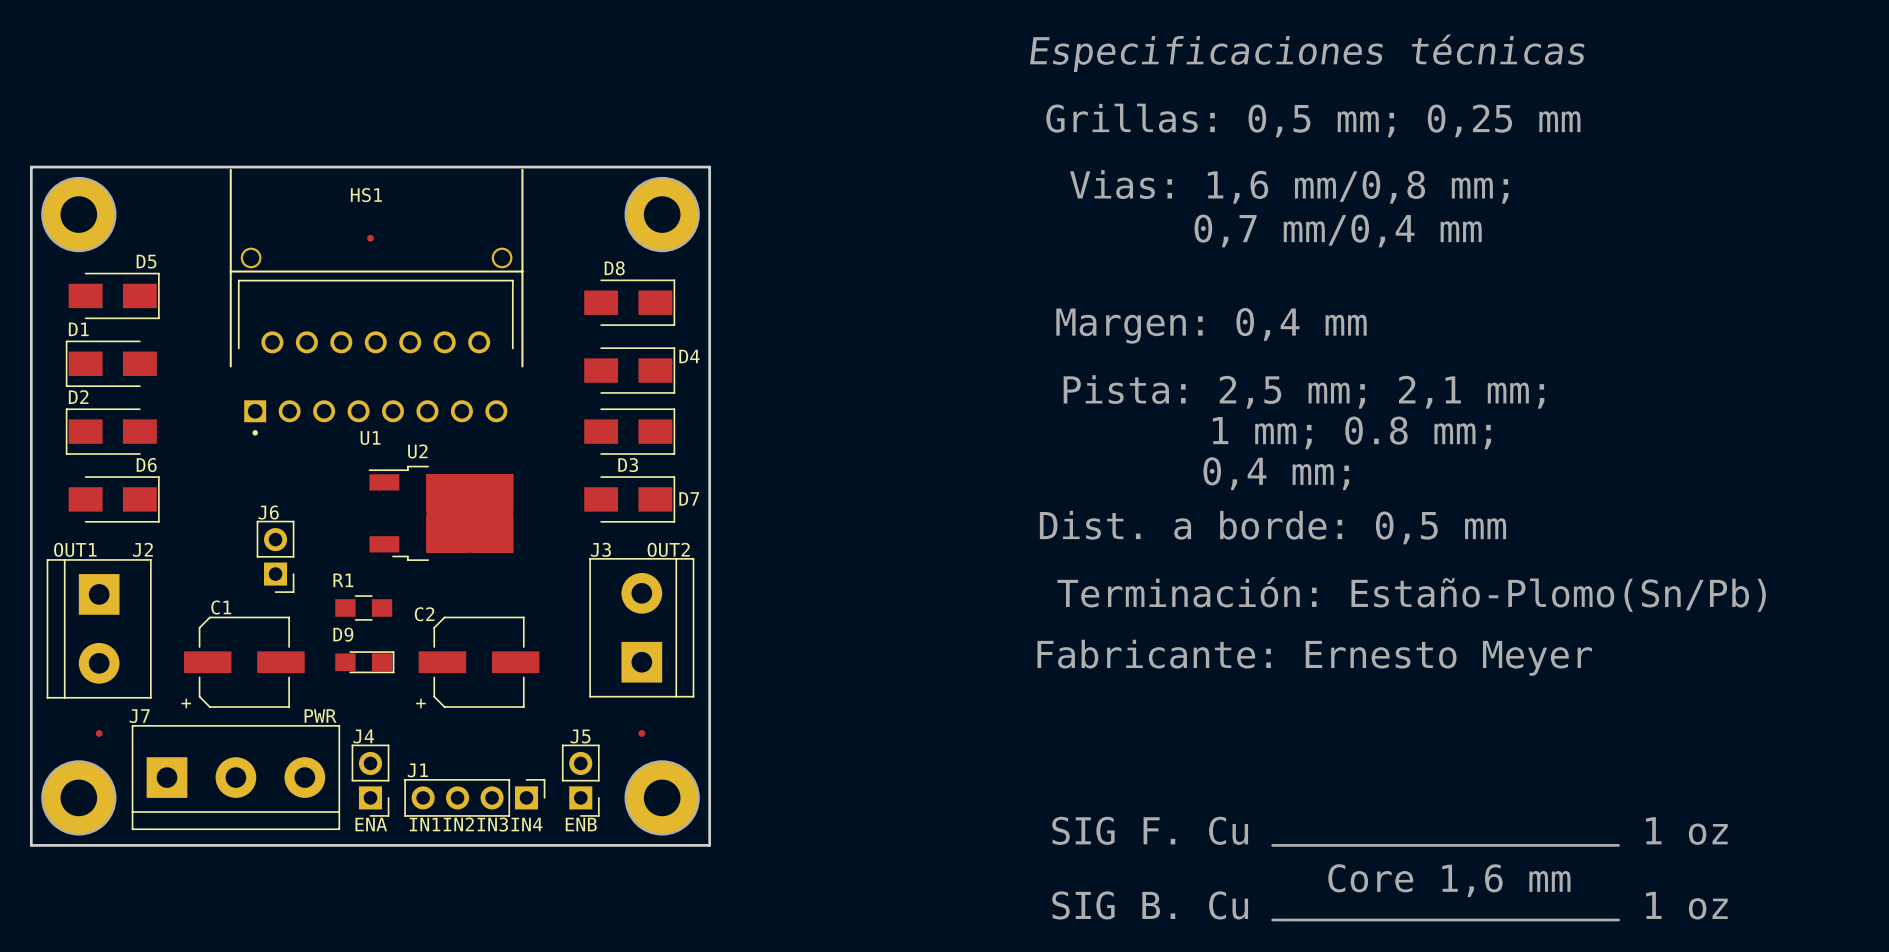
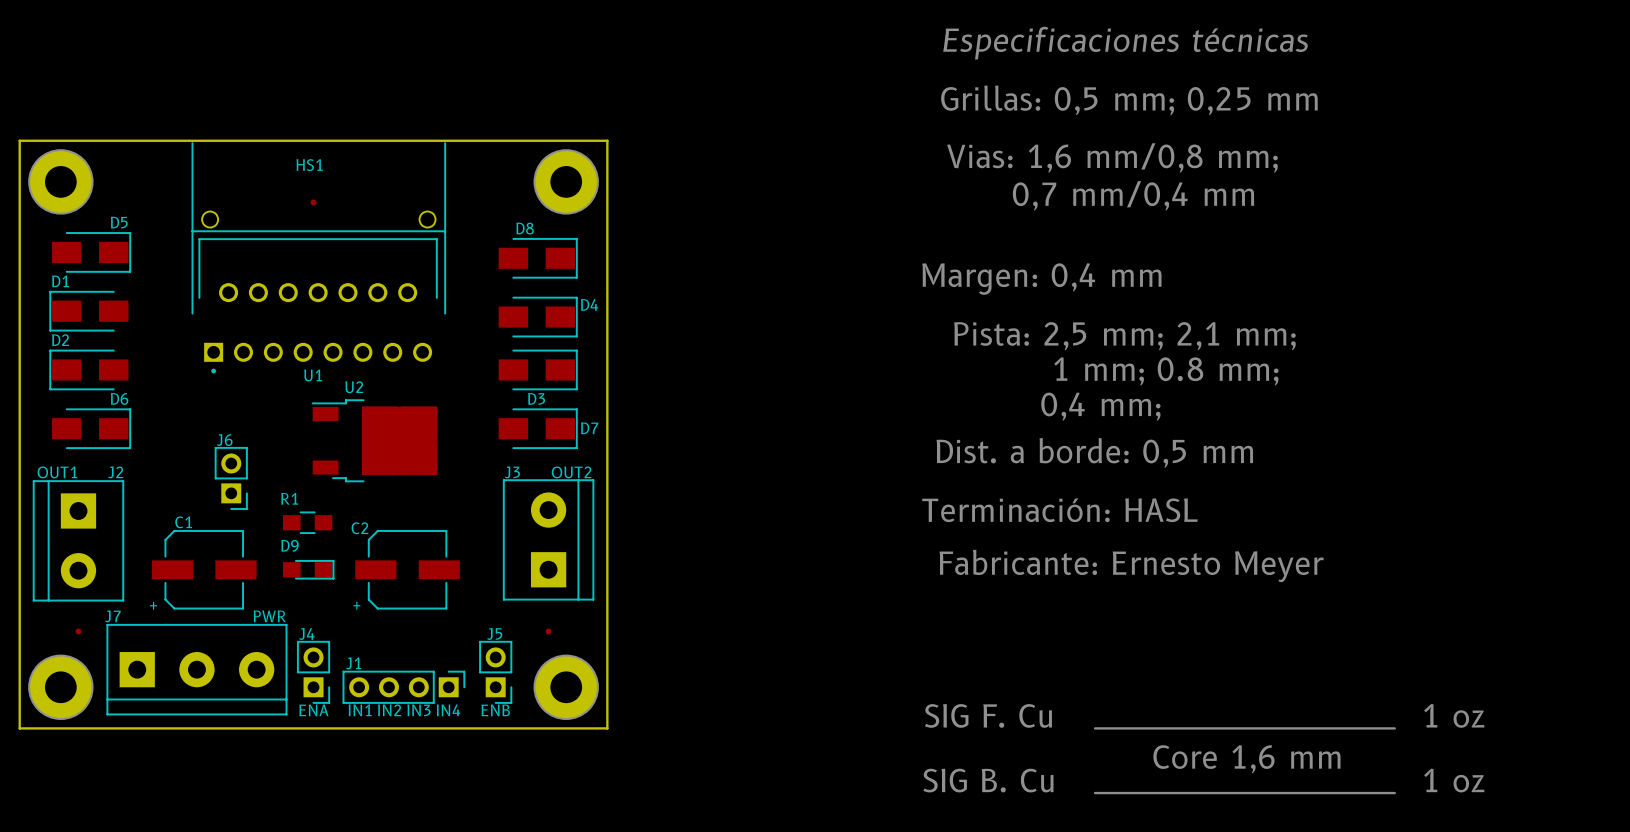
text: none -> Terminación: HASL (1059, 510)
text: Terminación: Estaño-Plomo(Sn/Pb) (1411, 594) -> none

